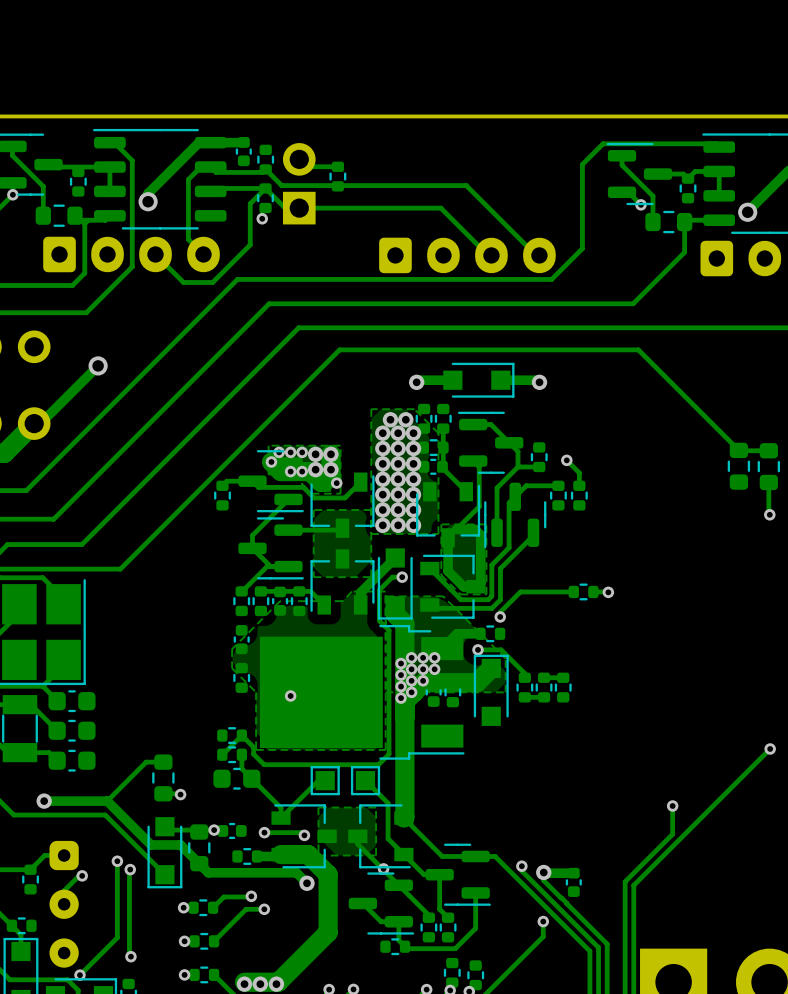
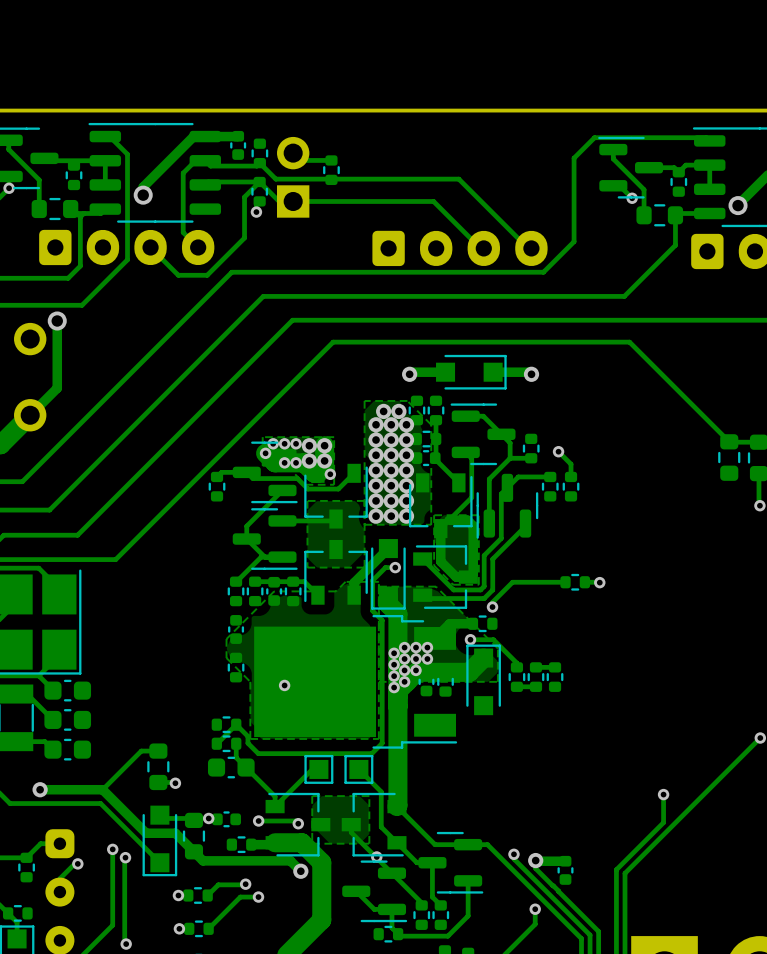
track: (98, 365) (40, 423) (34, 423) -> (57, 320) (57, 388) (30, 415)
via position: (98, 365) -> (57, 320)

